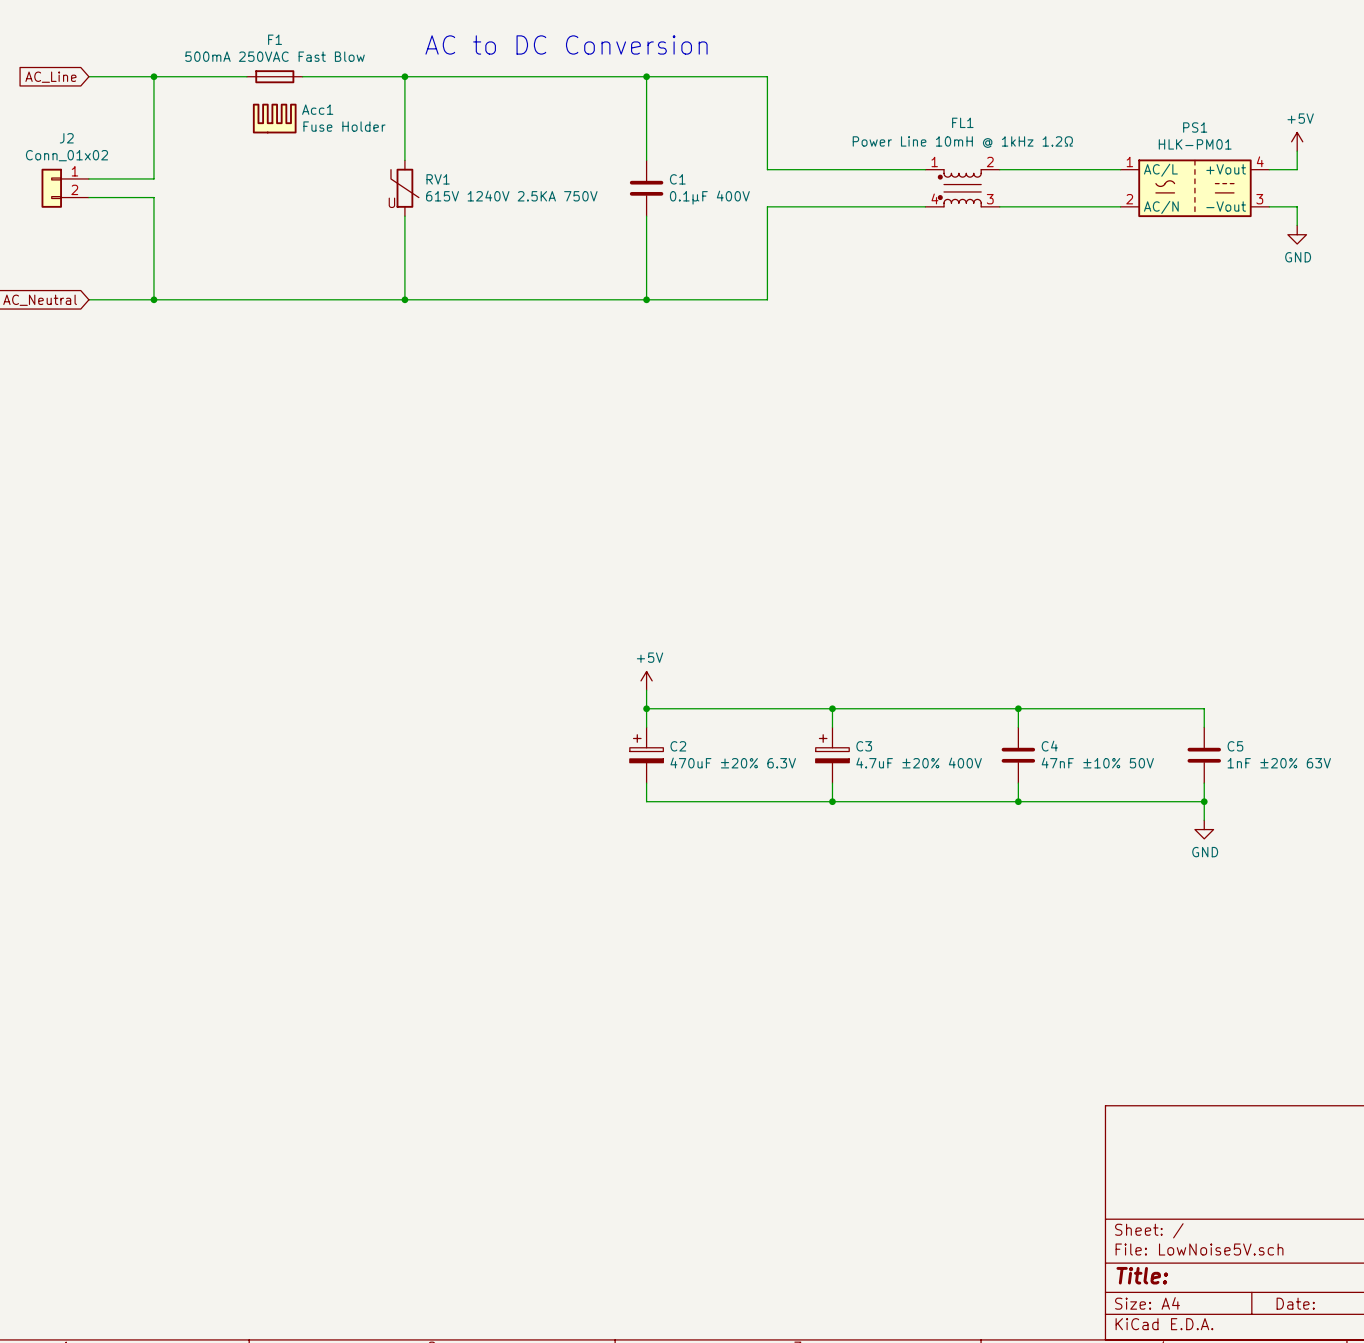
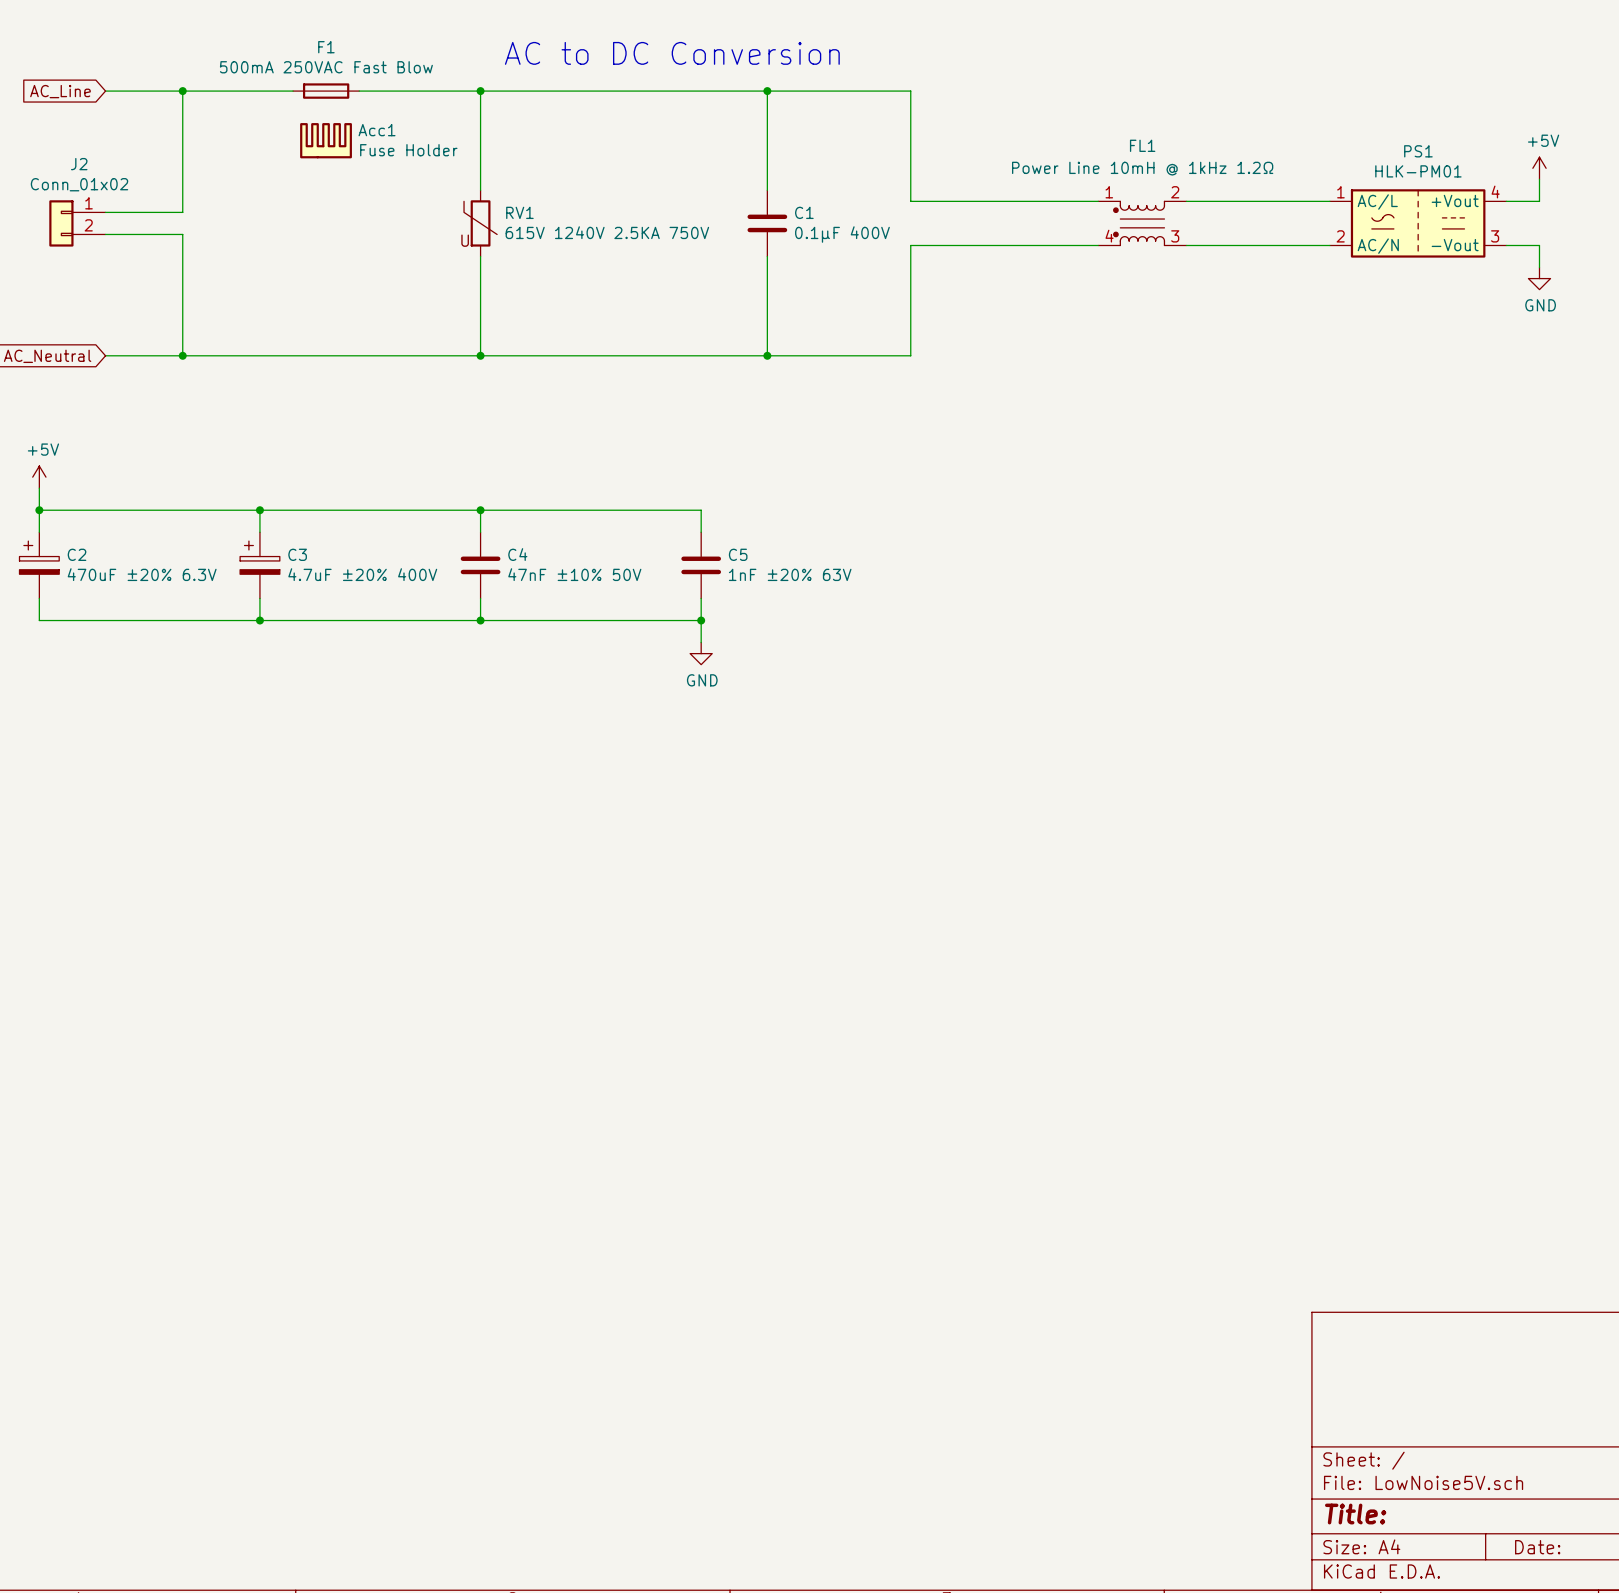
power symbol: none -> +5V (39, 477)
wire: none -> (39, 488) (39, 532)
wire: none -> (39, 510) (701, 510) (701, 532)
junction: none -> (39, 510)
wire: none -> (259, 510) (259, 532)
junction: none -> (259, 510)
wire: none -> (480, 510) (480, 532)
junction: none -> (480, 510)
wire: none -> (39, 598) (39, 620) (701, 620)
wire: none -> (259, 598) (259, 620)
wire: none -> (480, 598) (480, 620)
wire: none -> (701, 598) (701, 642)
junction: none -> (259, 620)
junction: none -> (480, 620)
junction: none -> (701, 620)
power symbol: none -> GND (701, 653)
power symbol: +5V (646, 680) -> none
wire: (646, 690) (646, 727) -> none
wire: (646, 708) (1204, 708) (1204, 727) -> none
junction: (646, 708) -> none
wire: (832, 708) (832, 727) -> none
junction: (832, 708) -> none
wire: (1018, 708) (1018, 727) -> none
junction: (1018, 708) -> none
C2 position: (646, 755) -> (39, 565)
C3 position: (832, 755) -> (259, 565)
C4 position: (1018, 755) -> (480, 565)
C5 position: (1204, 755) -> (701, 565)
wire: (646, 783) (646, 801) (1204, 801) -> none
wire: (832, 783) (832, 801) -> none
wire: (1018, 783) (1018, 801) -> none
wire: (1204, 783) (1204, 820) -> none
junction: (832, 801) -> none
junction: (1018, 801) -> none
junction: (1204, 801) -> none
power symbol: GND (1204, 829) -> none

